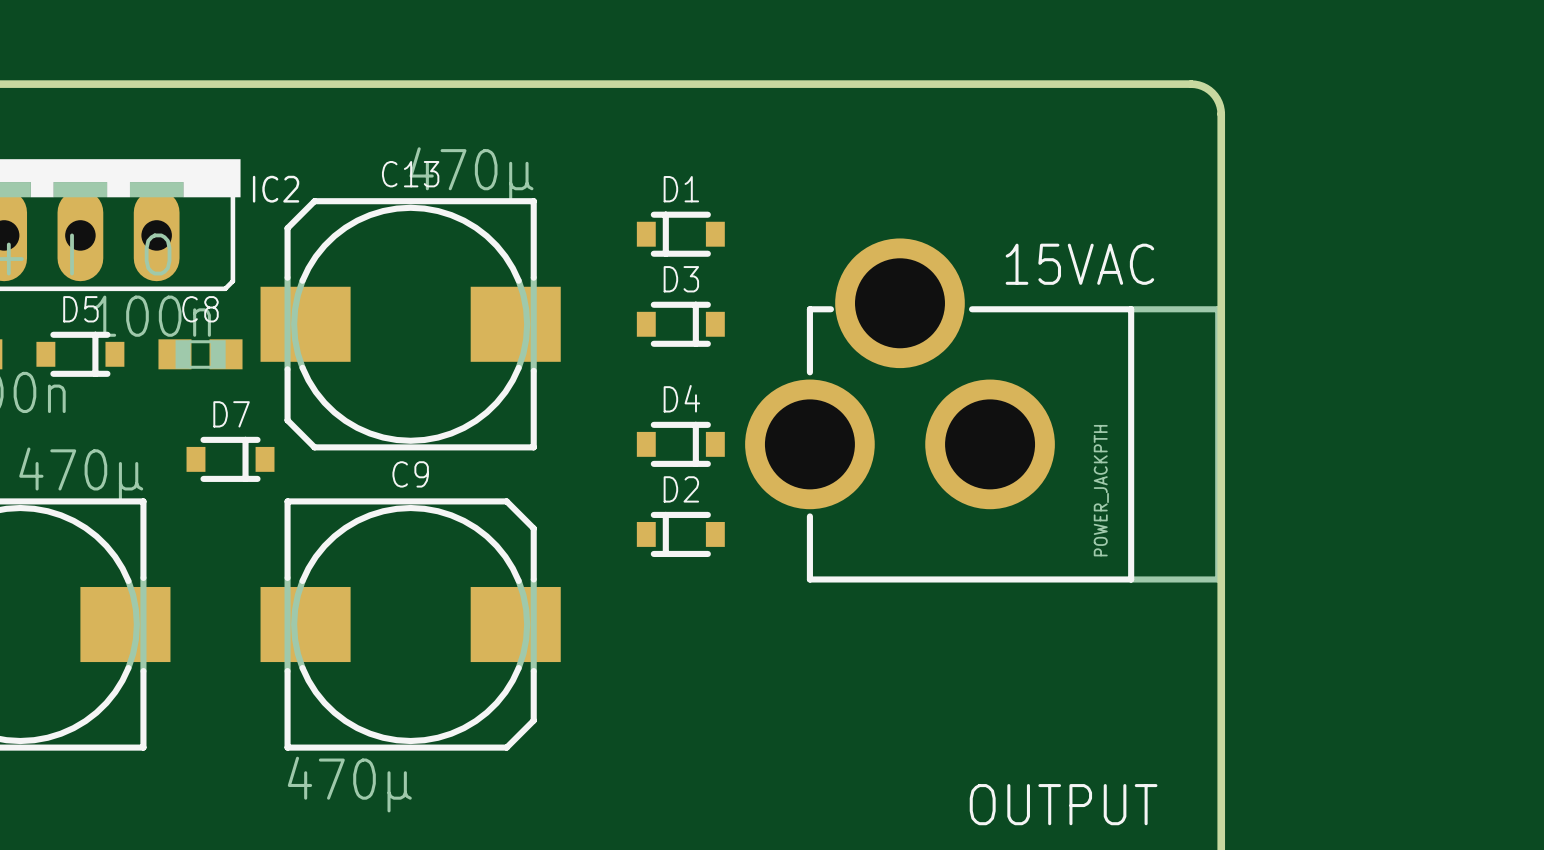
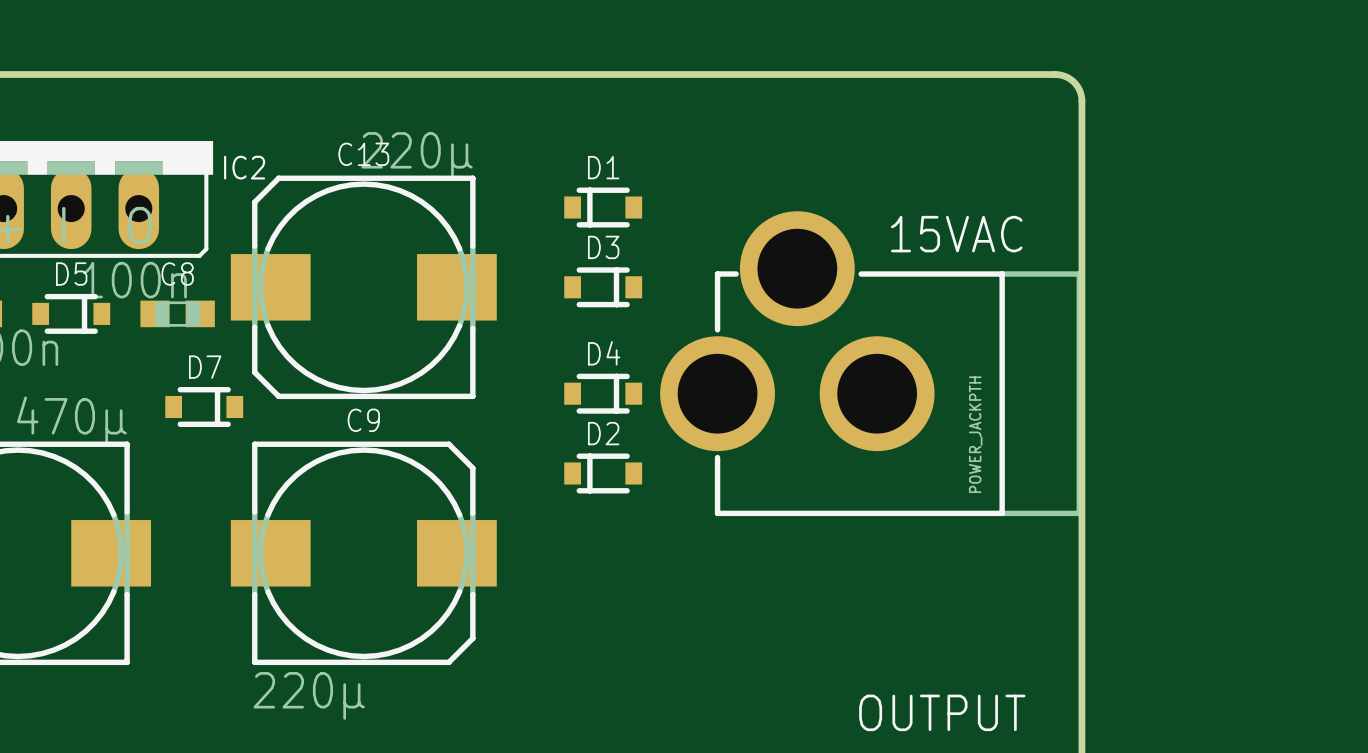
C13 value: 470µ (471, 175) -> 220µ (416, 155)
C9 value: 470µ (349, 784) -> 220µ (309, 695)

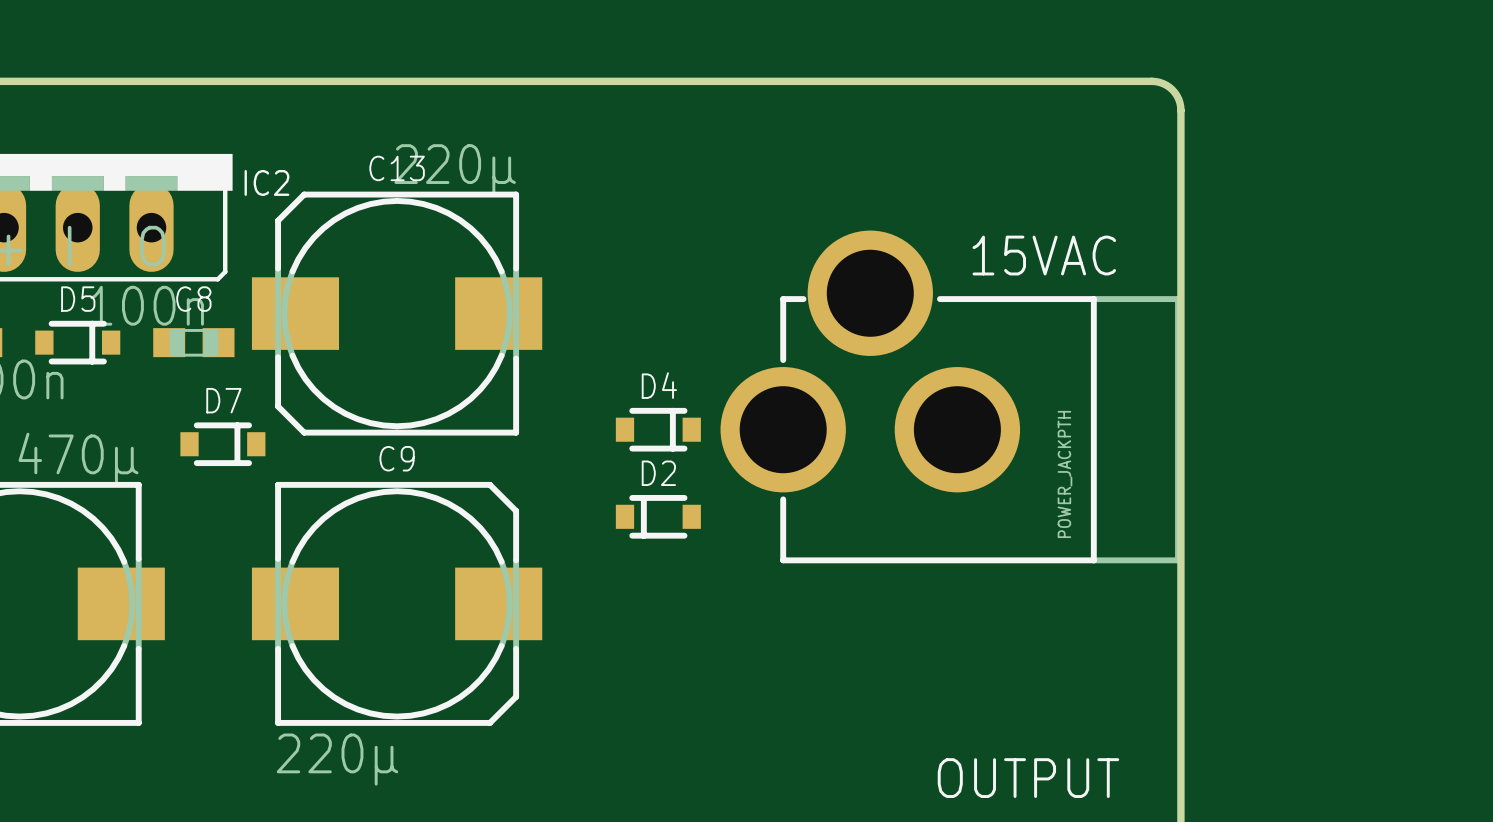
D1: (603, 207) -> none
D3: (603, 287) -> none

